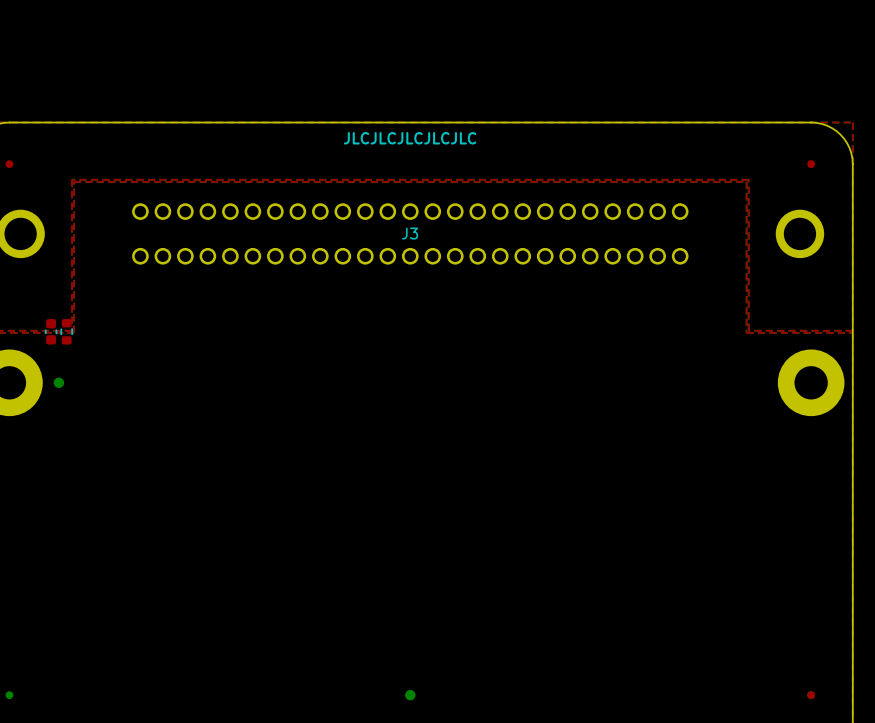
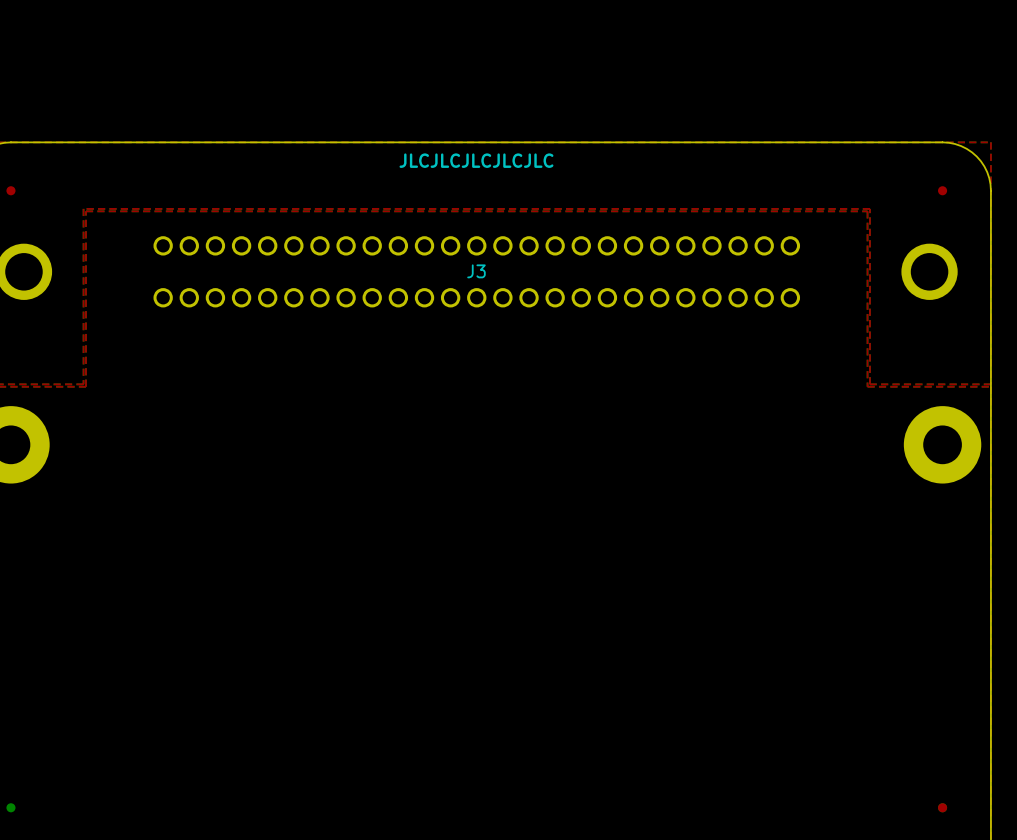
part: (51, 331) -> none
part: (66, 331) -> none
part: (58, 382) -> none
part: (410, 695) -> none

